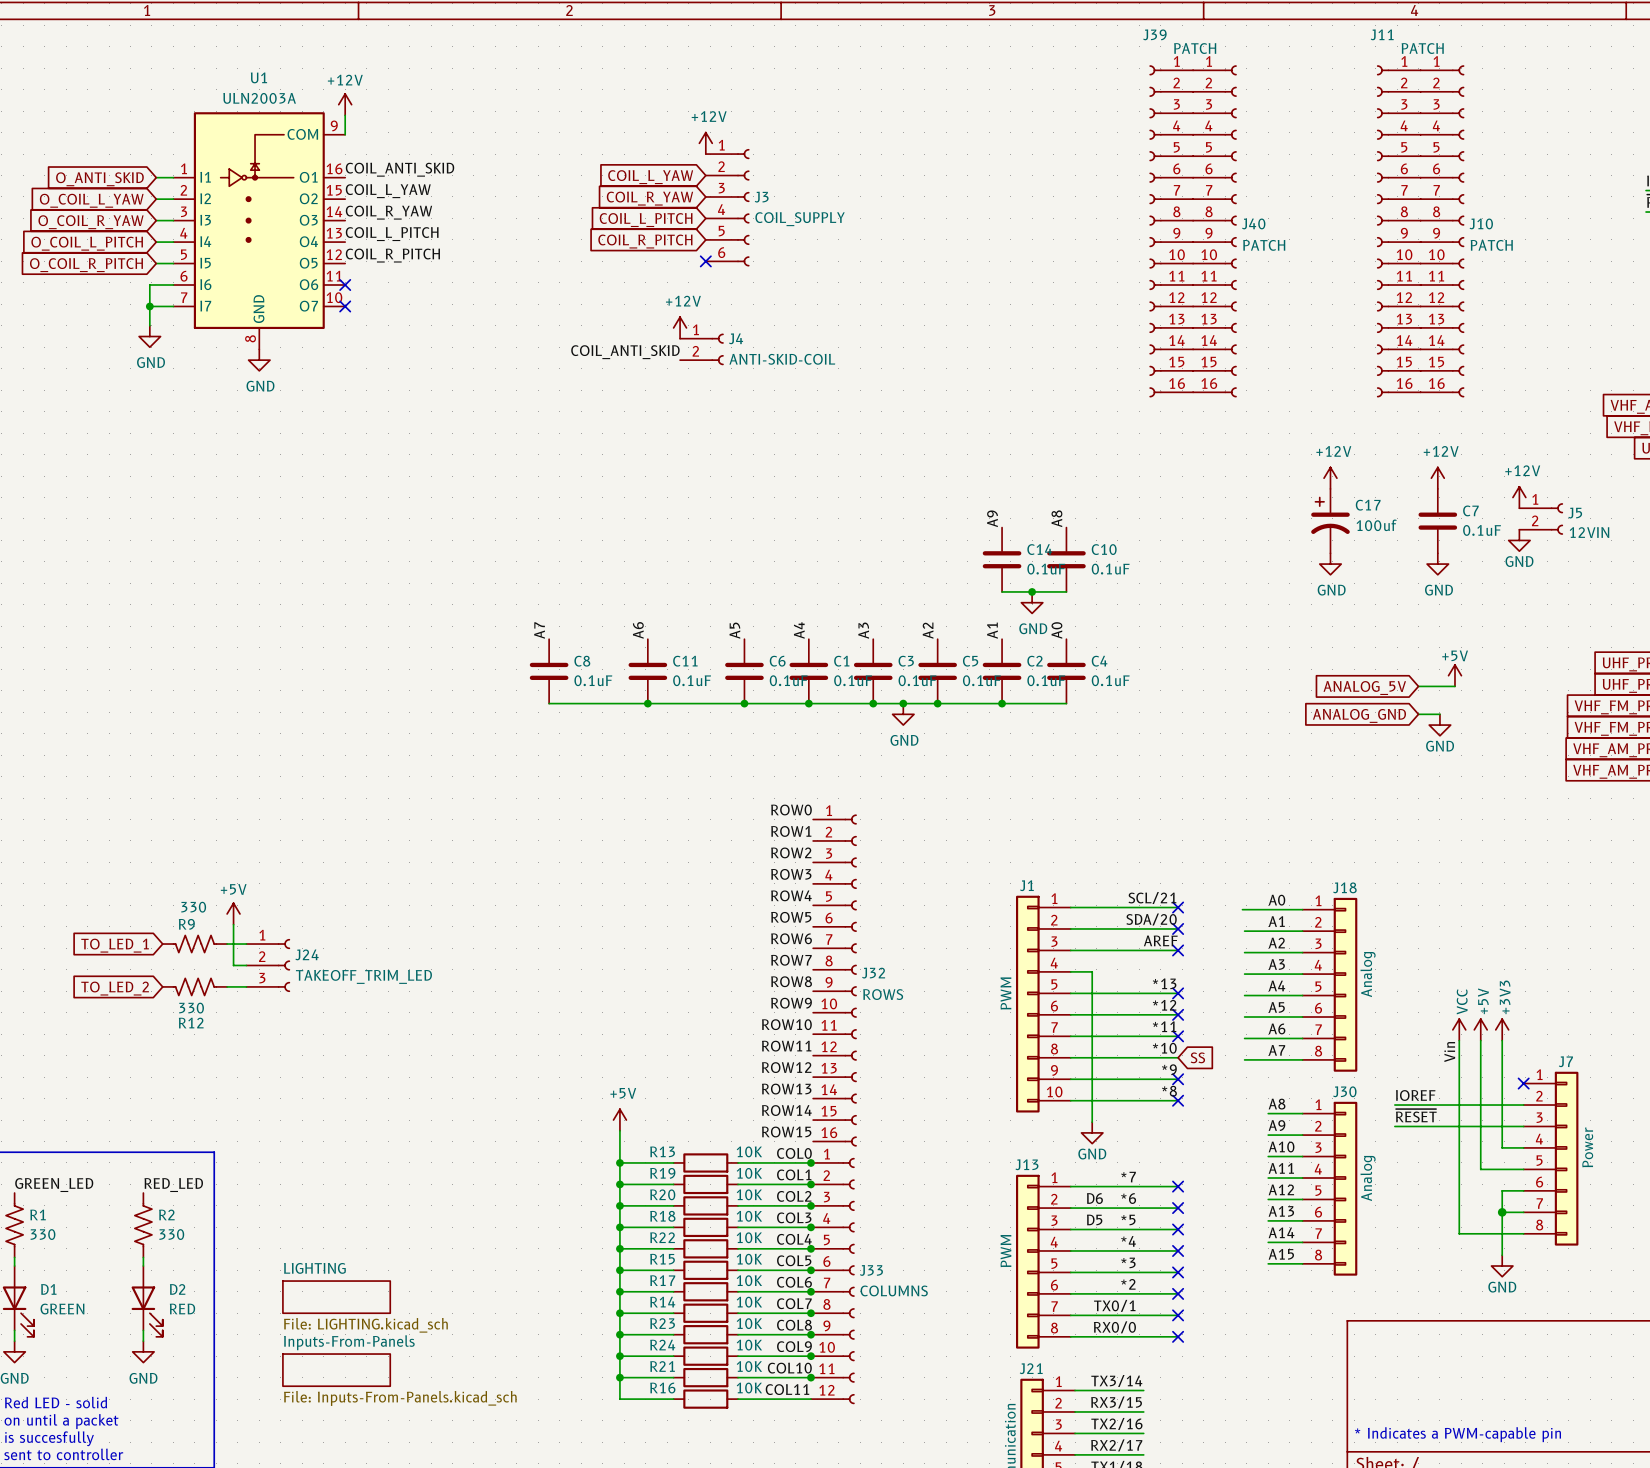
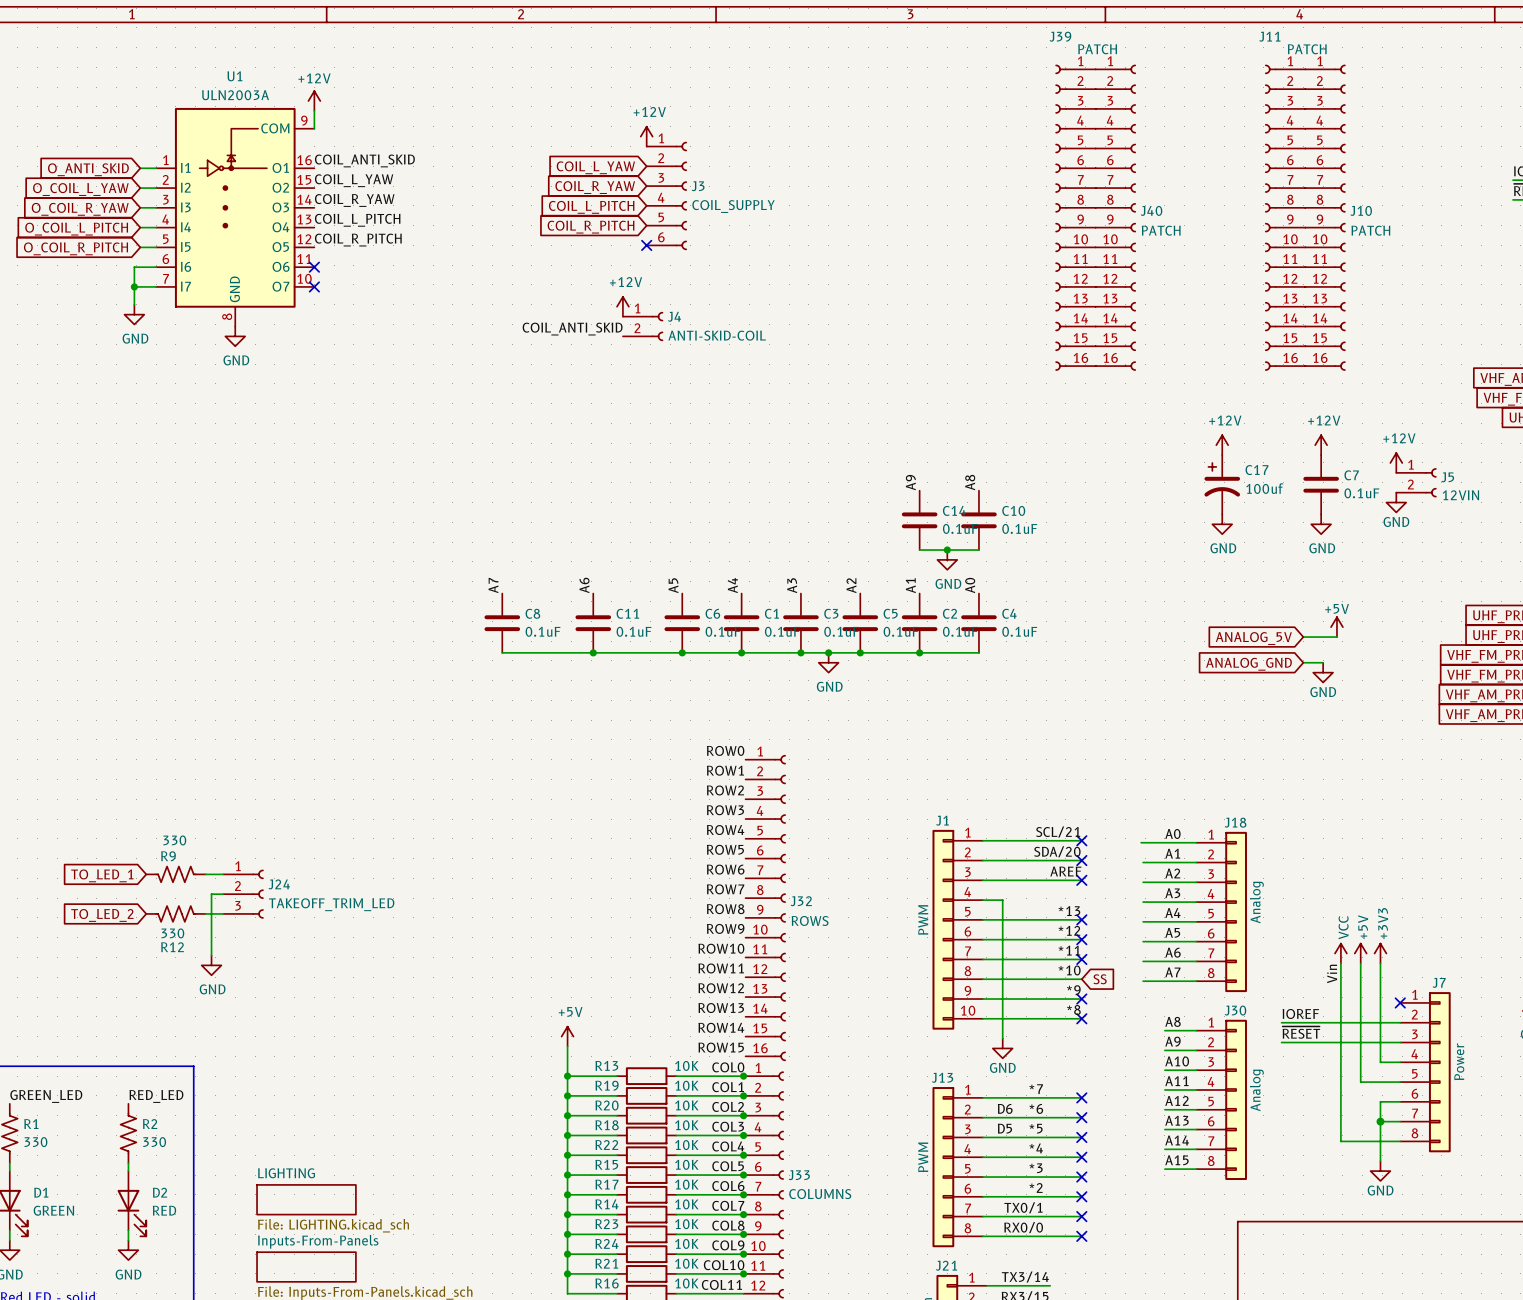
power symbol: +5V (233, 913) -> none
wire: (233, 924) (233, 965) -> (211, 955) (211, 894)
power symbol: none -> GND (211, 965)

